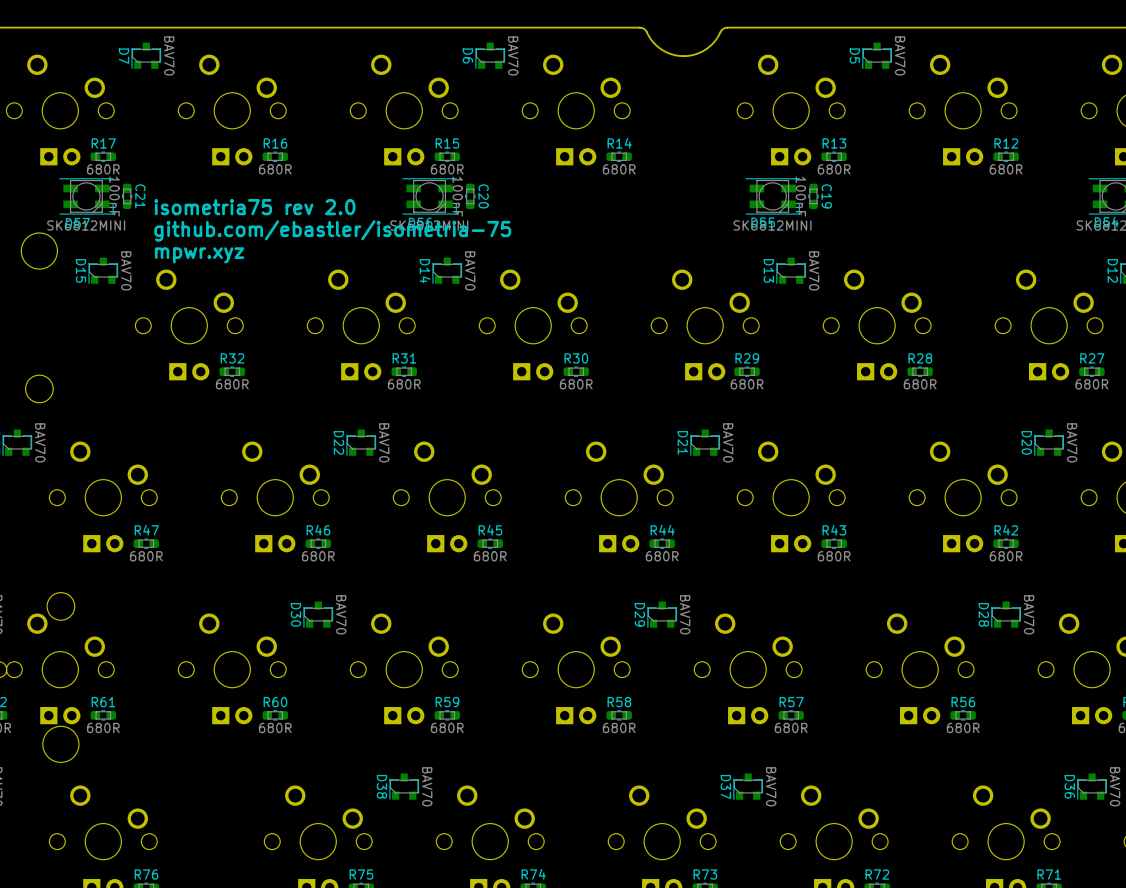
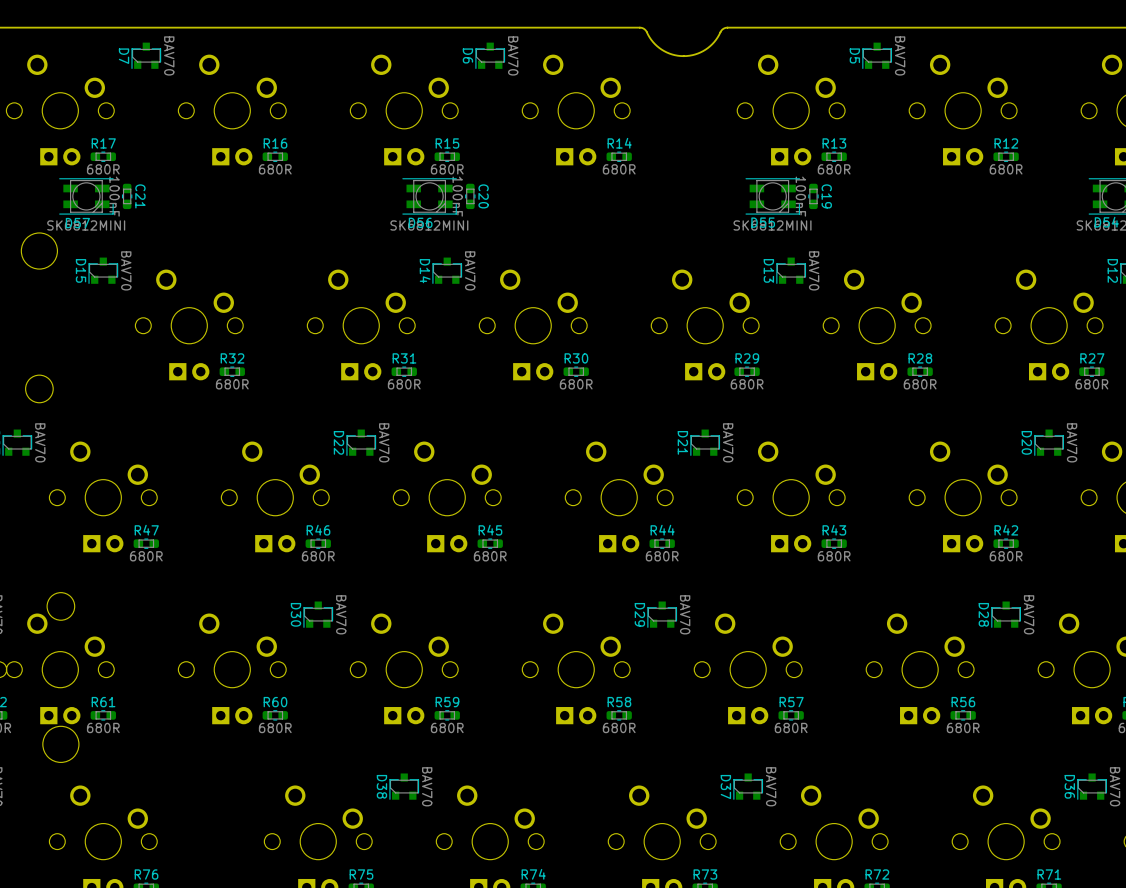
text: isometria75 rev 2.0 (254, 207) -> none
text: github.com/ebastler/isometria-75 (332, 230) -> none
text: mpwr.xyz (199, 255) -> none

